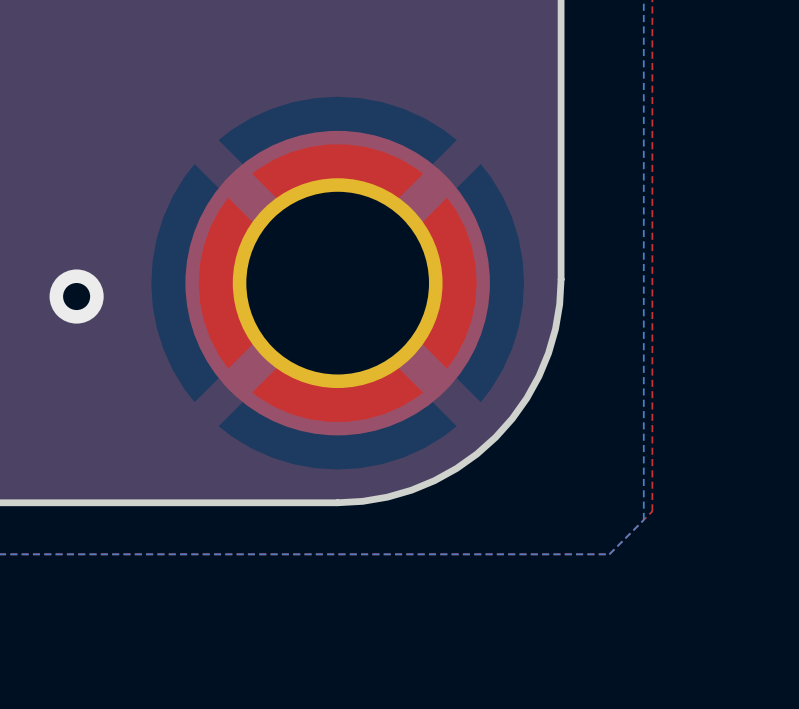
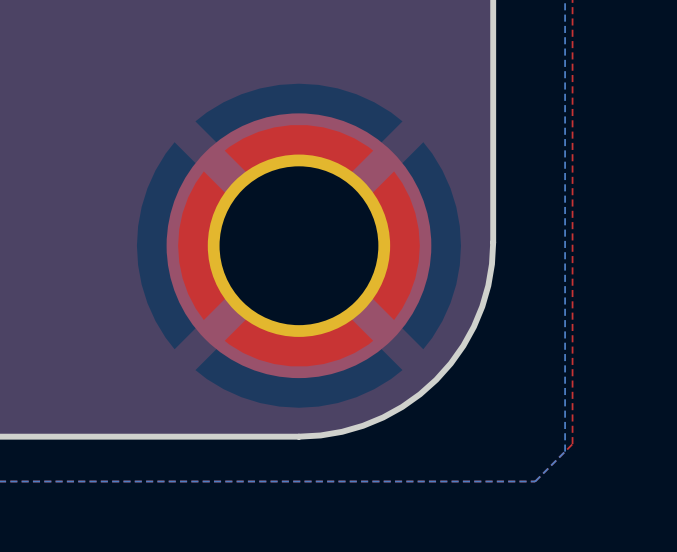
via: (76, 296) -> none

